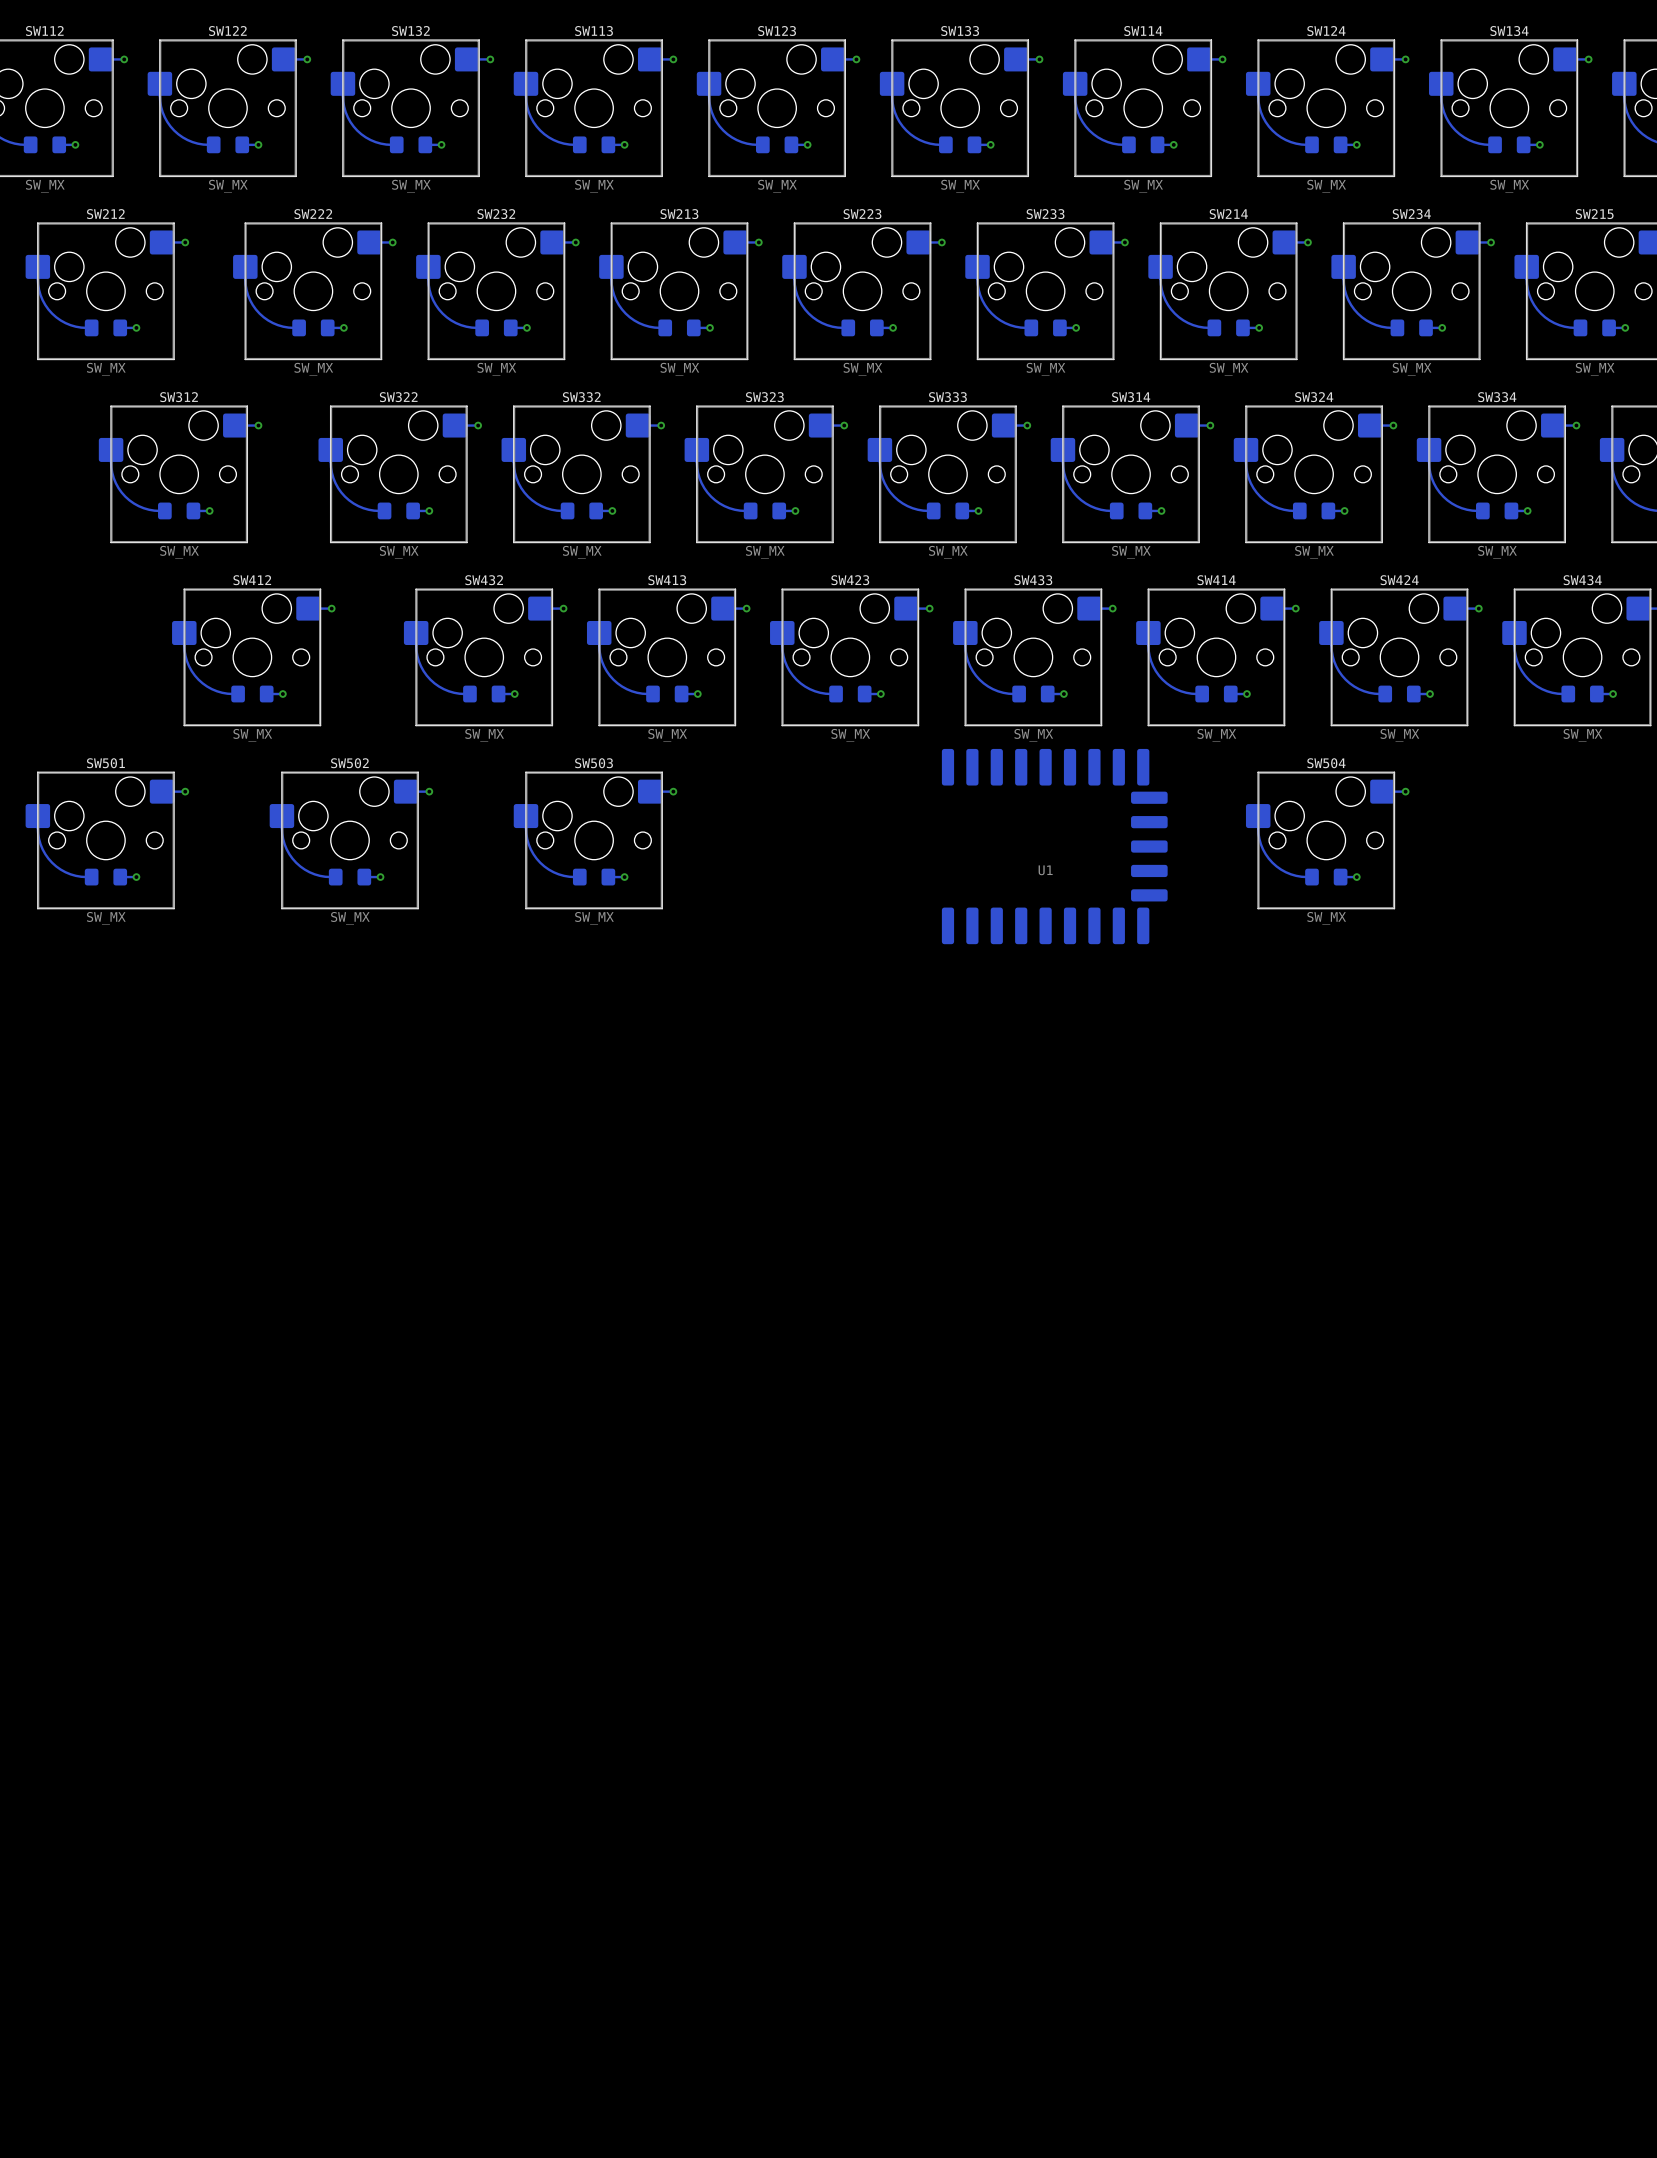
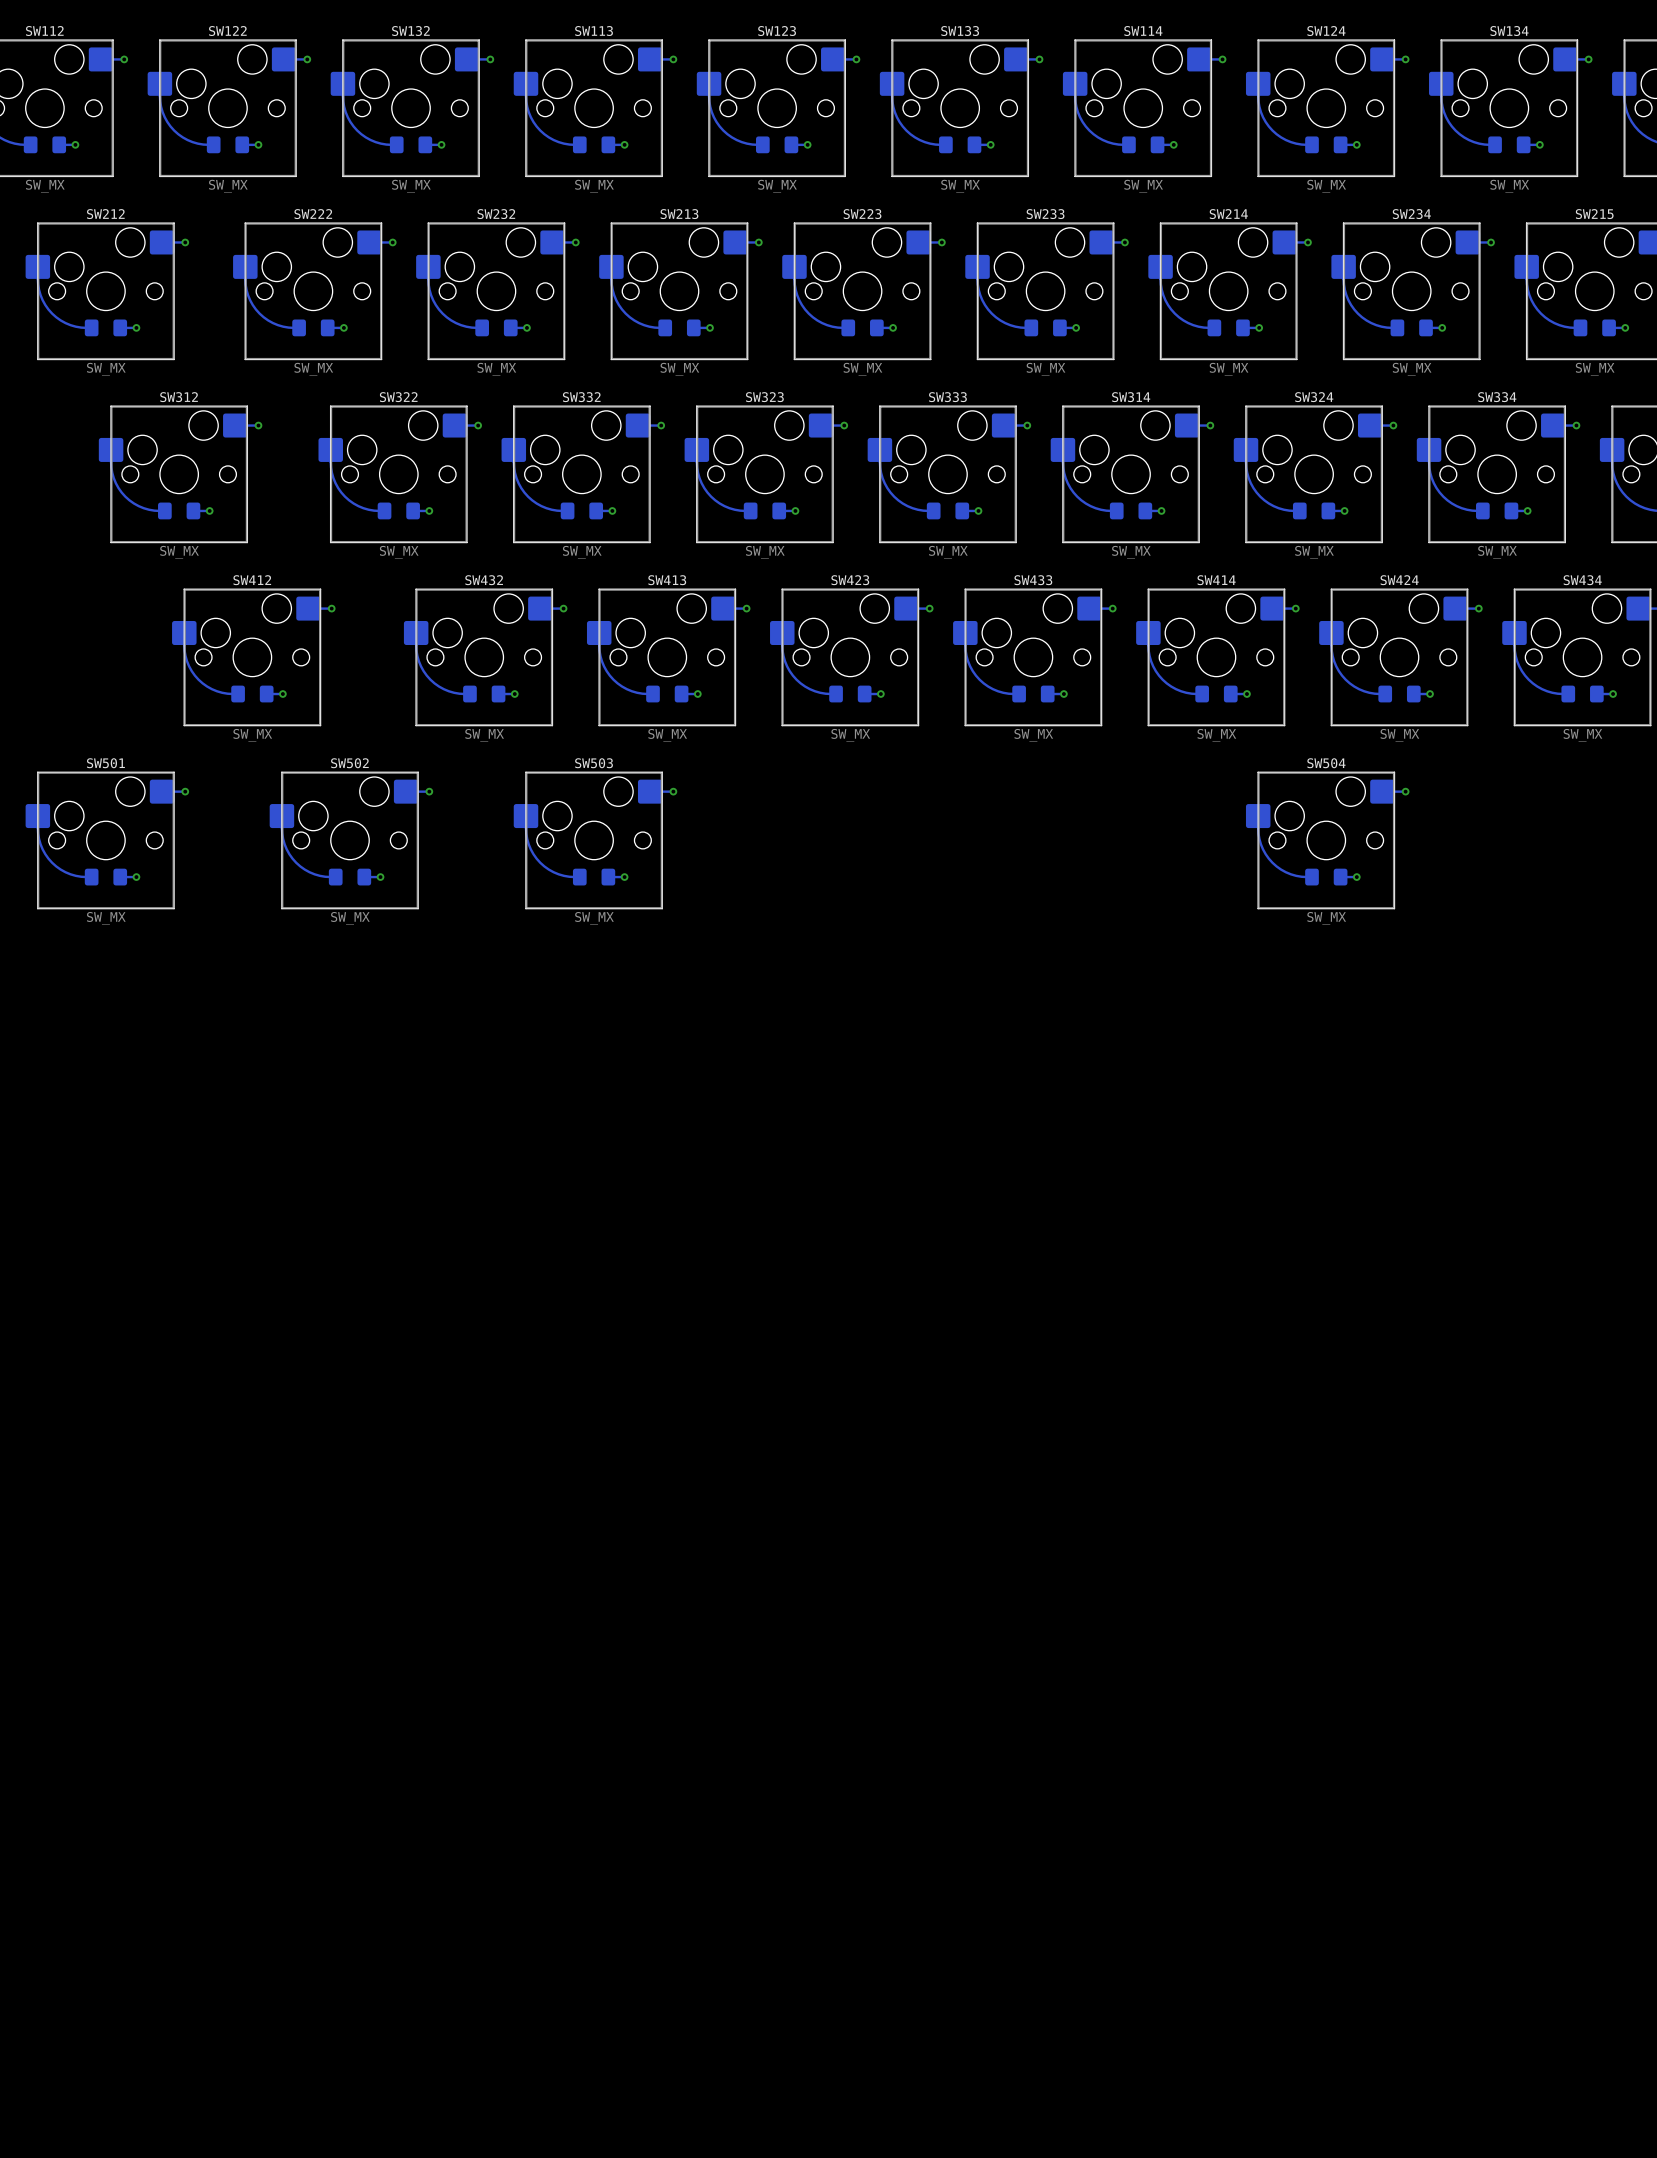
U1: (1054, 846) -> none

